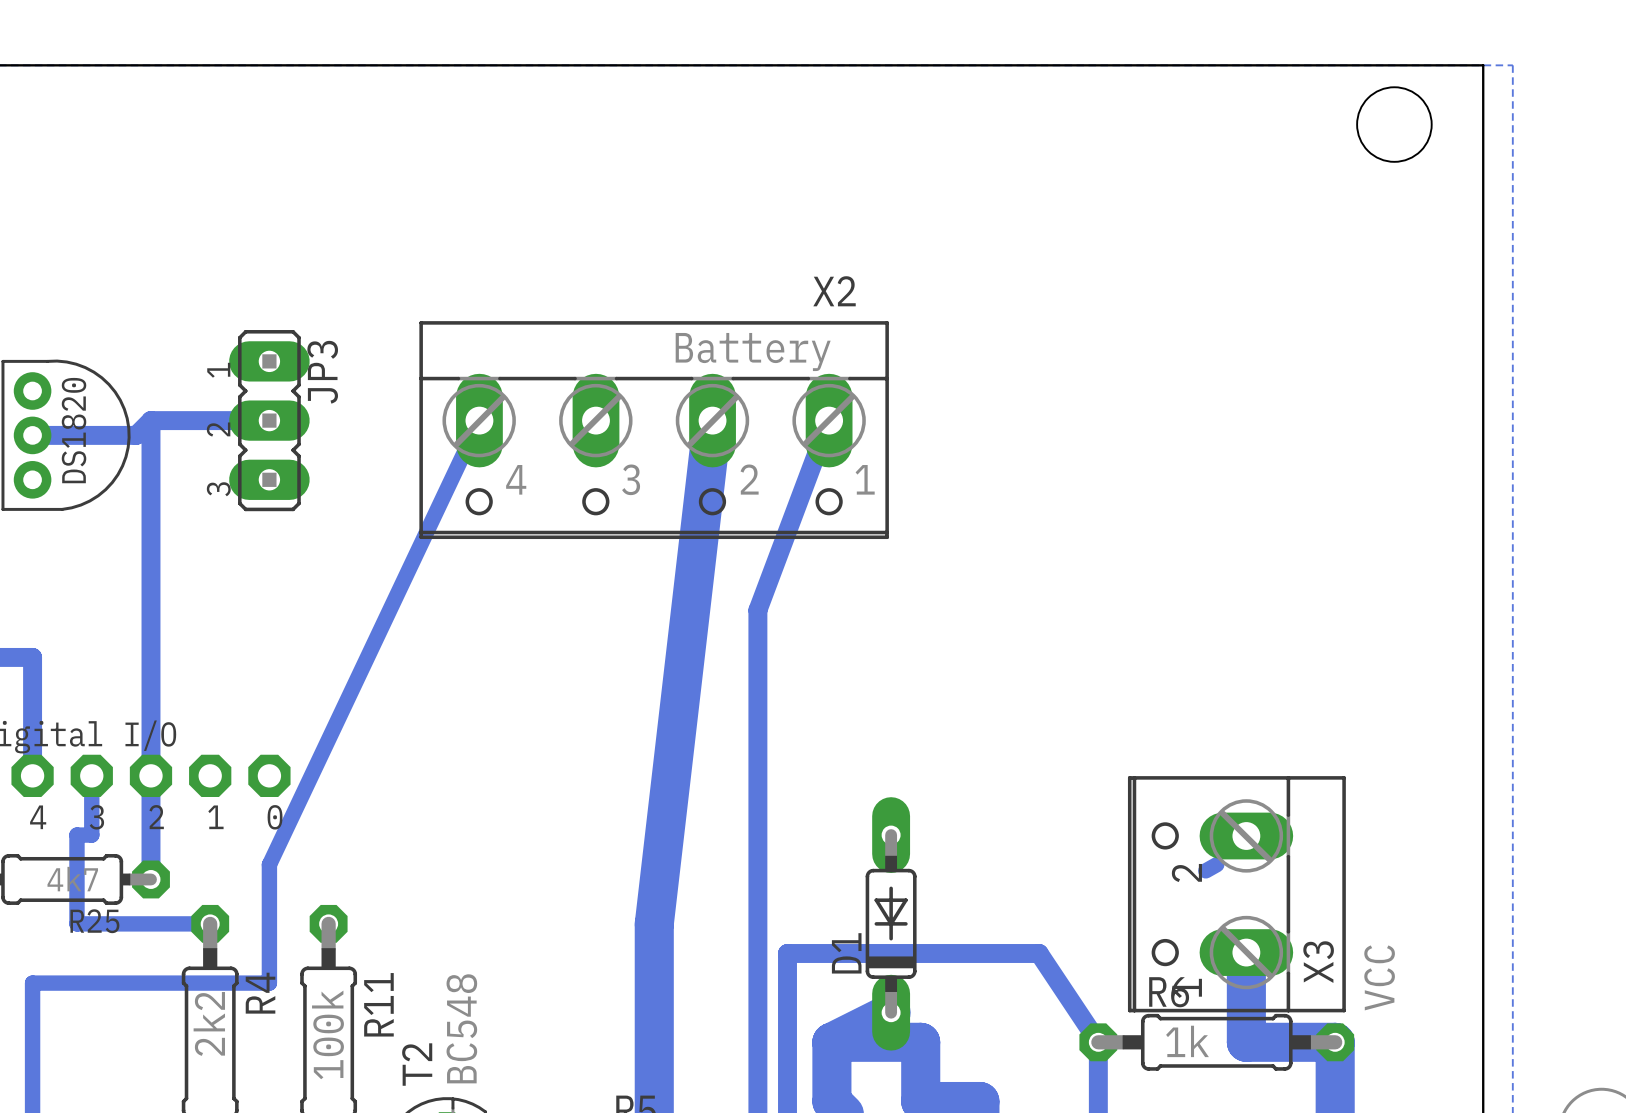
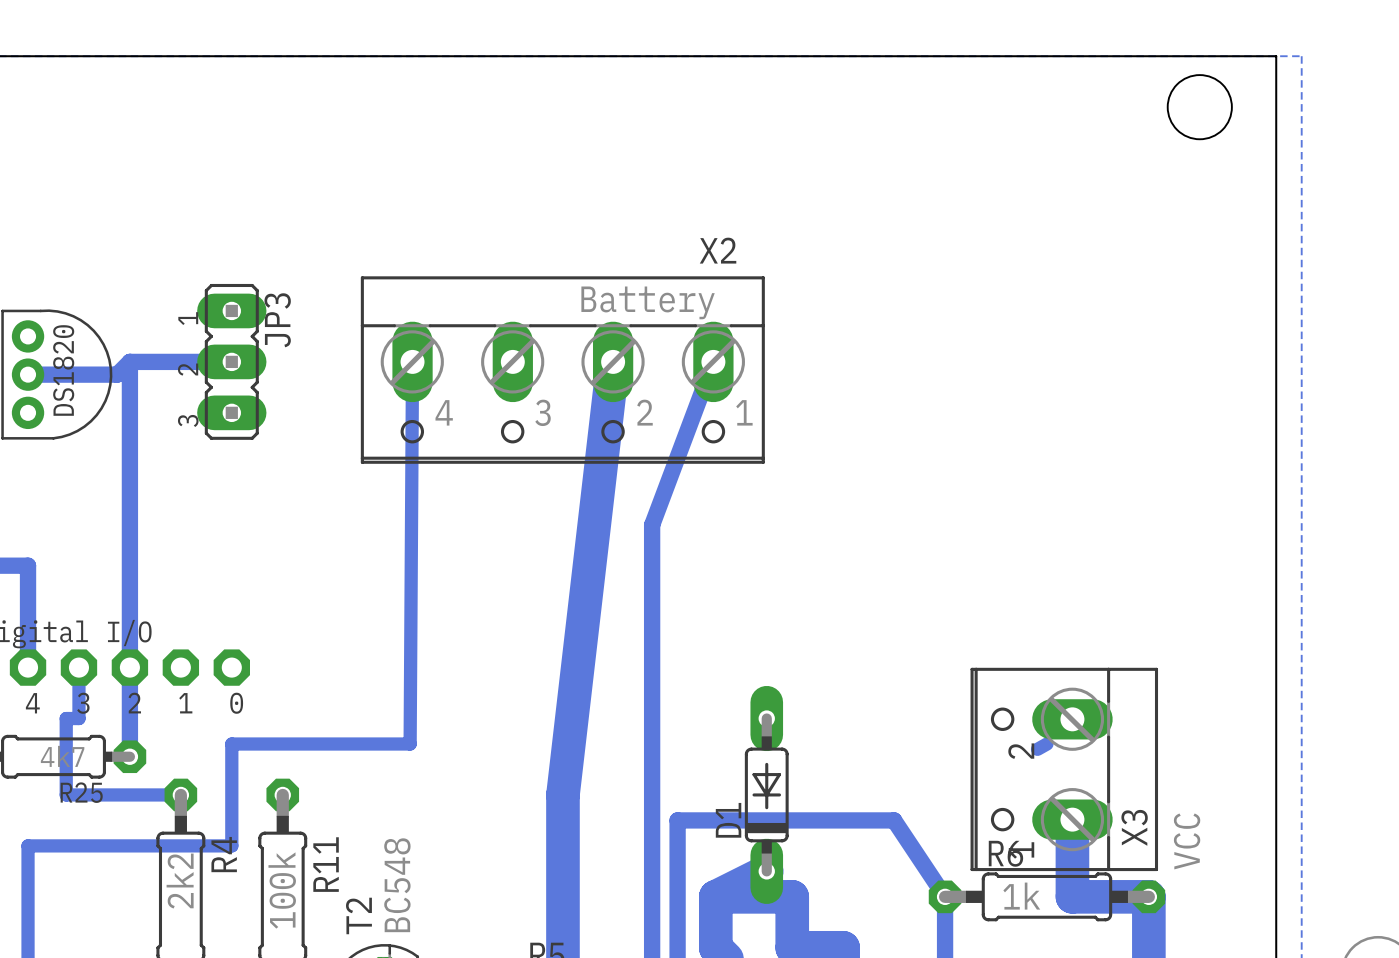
bottom track: (479, 420) (269, 864) -> (412, 361) (410, 744) (231, 744)

